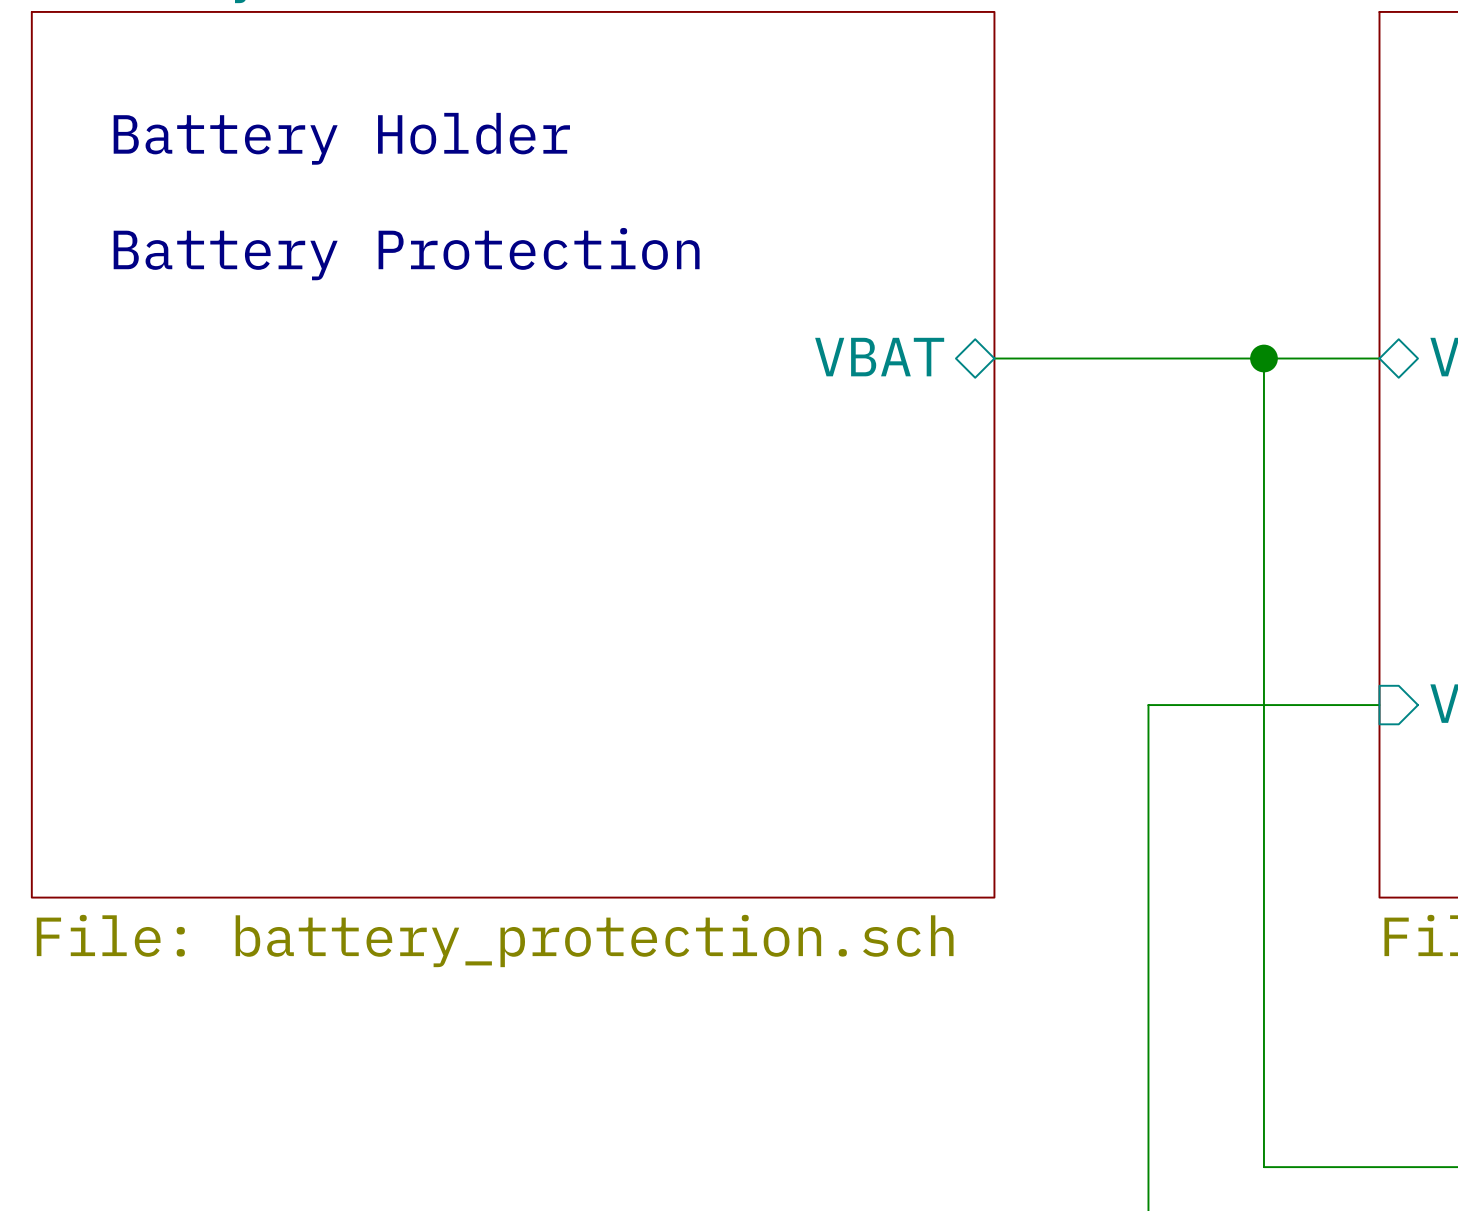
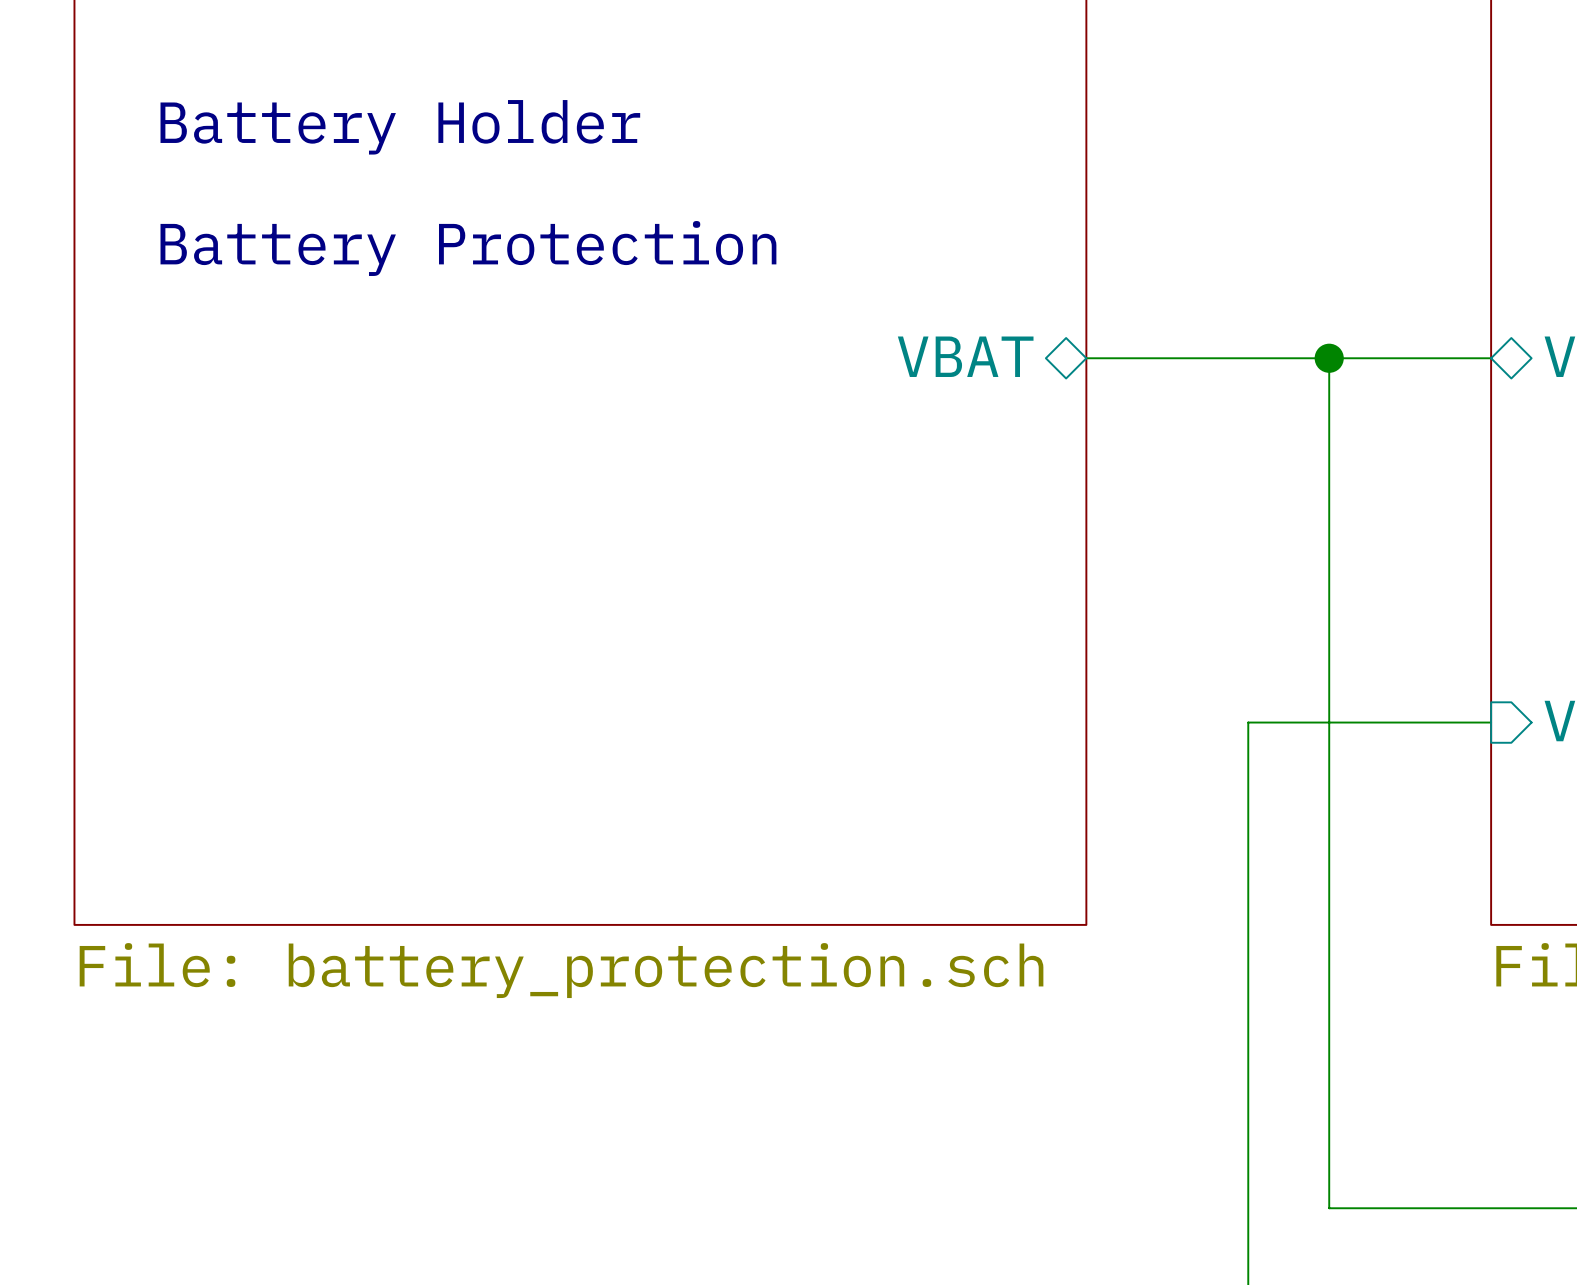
wire: (1263, 358) (1263, 1167) -> (1329, 358) (1329, 1208) (1369, 1208)
junction position: (1263, 358) -> (1329, 358)

